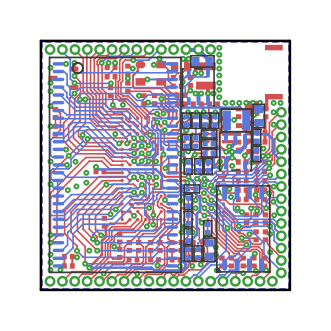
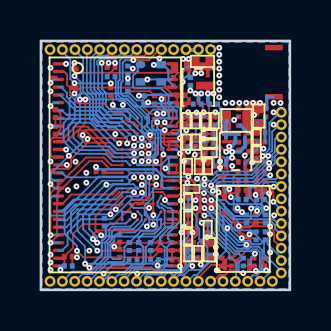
top track: (74, 49) (83, 58) (83, 91) (89, 97) (89, 118) (96, 126) (122, 126) -> none
bottom track: none -> (74, 49) (83, 58) (83, 91) (89, 97) (89, 118) (96, 126) (122, 126)
top track: (86, 49) (86, 90) (93, 96) (93, 116) (99, 122) (123, 122) (130, 126) -> none
bottom track: none -> (86, 49) (86, 90) (93, 96) (93, 116) (99, 122) (123, 122) (130, 126)
top track: (99, 49) (90, 58) (90, 90) (96, 95) (96, 113) (101, 118) (122, 118) -> none
bottom track: none -> (99, 49) (90, 58) (90, 90) (96, 95) (96, 113) (101, 118) (122, 118)
top track: (110, 49) (112, 50) (106, 55) (97, 55) (94, 59) (94, 89) (99, 94) (99, 110) (103, 114) (123, 114) -> (58, 71) (64, 71) (67, 74) (70, 95) (78, 103) (104, 103) (113, 113) (123, 114)
top track: (124, 49) (116, 58) (99, 58) (97, 61) (98, 89) (102, 93) (102, 107) (106, 111) (128, 111) (130, 118) -> none
bottom track: none -> (124, 49) (116, 58) (99, 58) (97, 61) (98, 89) (102, 93) (102, 107) (106, 111) (128, 111) (130, 118)
bottom track: (161, 49) (148, 60) (133, 60) -> (145, 126) (149, 122) (149, 116) (128, 95) (120, 94) (122, 62) (125, 60) (133, 60)
bottom track: (198, 49) (209, 60) (207, 75) (194, 76) (185, 86) (185, 95) (188, 101) -> none
part footprint: [190, 54, 215, 68] -> [190, 54, 215, 68]
part footprint: [48, 56, 182, 274] -> [48, 56, 182, 274]
top track: (124, 56) (119, 60) (118, 95) (121, 98) (126, 98) (145, 118) -> none
bottom track: (124, 56) (108, 56) (101, 62) -> (137, 118) (129, 108) (109, 108) (105, 105) (105, 92) (102, 89) (101, 62)
bottom track: none -> (124, 56) (119, 60) (118, 95) (121, 98) (126, 98) (145, 118)
bottom track: (159, 58) (164, 63) (172, 63) -> none
top track: (133, 60) (125, 60) (122, 62) (120, 94) (128, 95) (149, 116) (149, 122) (145, 126) -> (133, 60) (148, 60) (161, 49)
part footprint: [135, 60, 167, 86] -> [135, 60, 167, 86]
top track: (101, 62) (102, 89) (105, 92) (105, 105) (109, 108) (129, 108) (137, 118) -> (101, 62) (108, 56) (124, 56)
part footprint: [125, 63, 131, 77] -> [125, 63, 131, 77]
top track: (140, 64) (137, 64) (137, 71) (133, 75) (133, 86) (134, 88) (160, 88) (168, 95) (168, 103) (176, 111) (176, 118) -> none
bottom track: none -> (140, 64) (137, 64) (137, 71) (133, 75) (133, 86) (134, 88) (160, 88) (168, 95) (168, 103) (176, 111) (176, 118)
bottom track: none -> (153, 64) (163, 64) (168, 69) (168, 80) (173, 86)
bottom track: none -> (187, 66) (187, 67)
part footprint: [181, 68, 215, 107] -> [181, 68, 215, 107]
bottom track: (58, 71) (64, 71) (67, 74) (70, 95) (78, 103) (104, 103) (113, 113) (123, 114) -> (110, 49) (112, 50) (106, 55) (97, 55) (94, 59) (94, 89) (99, 94) (99, 110) (103, 114) (123, 114)
top track: none -> (172, 71) (77, 72) (74, 75)
bottom track: (172, 71) (77, 72) (74, 75) -> none
part footprint: [104, 74, 118, 80] -> [104, 74, 118, 80]
part footprint: [187, 74, 194, 88] -> [187, 74, 194, 88]
top track: (74, 75) (80, 81) (80, 93) (74, 98) (74, 118) (68, 125) (68, 139) (79, 150) (107, 150) (114, 157) -> (58, 141) (66, 141) (77, 130) (85, 130) (111, 157) (114, 157)
top track: (115, 76) (115, 96) (119, 100) (125, 100) (141, 117) (141, 130) (145, 134) (149, 130) (164, 130) -> (172, 196) (178, 196) (182, 191) (182, 185) (179, 182) (179, 158) (183, 155) (183, 151) (177, 145) (164, 143) (164, 130)
part footprint: [125, 80, 131, 94] -> [125, 80, 131, 94]
bottom track: (172, 87) (80, 87) (74, 93) -> (130, 164) (126, 161) (113, 161) (105, 153) (76, 153) (63, 141) (63, 122) (69, 116) (69, 98) (74, 93)
top track: (74, 93) (69, 98) (69, 116) (63, 122) (63, 141) (76, 153) (105, 153) (113, 161) (126, 161) (130, 164) -> (74, 93) (80, 87) (172, 87)
part footprint: [141, 93, 147, 107] -> [141, 93, 147, 107]
bottom track: none -> (273, 96) (266, 96) (265, 108)
bottom track: (161, 98) (178, 98) (182, 107) (240, 107) (246, 113) (246, 122) (256, 122) (256, 134) (267, 134) (273, 139) (273, 153) (281, 161) -> (161, 98) (161, 105) (168, 112) (168, 118)
top track: (79, 99) (79, 120) (73, 127) (73, 137) (82, 146) (109, 146) (116, 153) -> (58, 157) (52, 157) (50, 155) (50, 139) (52, 137) (64, 137) (75, 126) (87, 126) (116, 153)
part footprint: [190, 101, 204, 107] -> [190, 101, 204, 107]
part footprint: [207, 101, 221, 107] -> [207, 101, 221, 107]
part footprint: [252, 103, 266, 129] -> [252, 103, 266, 129]
part footprint: [220, 108, 253, 133] -> [220, 108, 253, 133]
part footprint: [181, 112, 192, 130] -> [181, 112, 192, 130]
part footprint: [191, 112, 201, 130] -> [191, 112, 201, 130]
part footprint: [200, 112, 211, 130] -> [200, 112, 211, 130]
part footprint: [210, 112, 220, 130] -> [210, 112, 220, 130]
top track: (281, 112) (269, 122) (269, 149) (262, 156) -> none
bottom track: none -> (281, 112) (269, 122) (269, 149) (262, 156)
bottom track: none -> (238, 116) (234, 119)
top track: (265, 116) (264, 141) -> none
bottom track: none -> (265, 116) (264, 141)
top track: (281, 124) (281, 122) (272, 131) (272, 150) (268, 156) -> none
bottom track: none -> (281, 124) (281, 122) (272, 131) (272, 150) (268, 156)
bottom track: none -> (238, 125) (240, 125) (248, 133)
part footprint: [252, 128, 262, 146] -> [252, 128, 262, 146]
part footprint: [200, 129, 218, 139] -> [200, 129, 218, 139]
bottom track: (164, 130) (164, 143) (177, 145) (183, 151) (183, 155) (179, 158) (179, 182) (182, 185) (182, 191) (178, 196) (172, 196) -> (164, 130) (149, 130) (145, 134) (141, 130) (141, 117) (125, 100) (119, 100) (115, 96) (115, 76)
part footprint: [219, 132, 253, 171] -> [219, 132, 253, 171]
part footprint: [181, 133, 192, 151] -> [181, 133, 192, 151]
part footprint: [191, 133, 201, 151] -> [191, 133, 201, 151]
bottom track: none -> (238, 133) (223, 134)
top track: (281, 137) (274, 138) (274, 152) (272, 154) (272, 159) (269, 162) (264, 161) -> none
bottom track: none -> (281, 137) (274, 138) (274, 152) (272, 154) (272, 159) (269, 162) (264, 161)
bottom track: (87, 138) (86, 144) (71, 159) (71, 166) (68, 168) (52, 168) (50, 174) -> (68, 155) (50, 174)
part footprint: [200, 138, 218, 149] -> [200, 138, 218, 149]
bottom track: (58, 141) (66, 141) (77, 130) (85, 130) (111, 157) (114, 157) -> (74, 75) (80, 81) (80, 93) (74, 98) (74, 118) (68, 125) (68, 139) (79, 150) (107, 150) (114, 157)
bottom track: none -> (207, 141) (192, 141) (184, 149)
part footprint: [252, 145, 262, 163] -> [252, 145, 262, 163]
part footprint: [200, 148, 218, 158] -> [200, 148, 218, 158]
bottom track: none -> (281, 149) (274, 156) (274, 163) (264, 171)
bottom track: (116, 153) (87, 126) (75, 126) (64, 137) (52, 137) (50, 139) (50, 155) (52, 157) (58, 157) -> (116, 153) (109, 146) (82, 146) (73, 137) (73, 127) (79, 120) (79, 99)
top track: (68, 155) (50, 174) -> (87, 138) (86, 144) (71, 159) (71, 166) (68, 168) (52, 168) (50, 174)
bottom track: none -> (176, 157) (168, 157) (168, 172)
part footprint: [183, 158, 193, 175] -> [183, 158, 193, 175]
part footprint: [194, 158, 204, 175] -> [194, 158, 204, 175]
part footprint: [203, 158, 213, 175] -> [203, 158, 213, 175]
bottom track: (220, 167) (213, 167) (210, 170) (188, 170) (188, 176) (194, 182) (194, 192) (199, 198) (199, 210) (197, 213) (197, 234) (182, 245) (182, 261) (185, 264) (182, 270) (154, 270) (151, 267) (89, 267) -> (130, 219) (125, 223) (110, 223) (105, 227) (105, 237) (101, 240) (101, 254) (89, 267)
bottom track: none -> (160, 172) (164, 176) (188, 176)
top track: (122, 180) (102, 180) (71, 212) (71, 232) (85, 246) (85, 263) -> none
bottom track: none -> (122, 180) (102, 180) (71, 212) (71, 232) (85, 246) (85, 263)
top track: (130, 180) (125, 176) (98, 176) (64, 211) (64, 233) (76, 245) (76, 250) -> (172, 250) (159, 250) (153, 257) (83, 257) (76, 250)
bottom track: (174, 180) (179, 186) (179, 190) (178, 192) (159, 192) (149, 207) -> (129, 203) (133, 207) (149, 207)
top track: none -> (57, 182) (58, 203) (62, 203) (71, 194) (112, 194) (118, 188)
bottom track: (57, 182) (58, 203) (62, 203) (71, 194) (112, 194) (118, 188) -> none
top track: (106, 184) (77, 213) (77, 230) (97, 250) -> (172, 242) (161, 242) (154, 250) (97, 250)
part footprint: [183, 184, 201, 194] -> [183, 184, 201, 194]
part footprint: [216, 185, 271, 273] -> [216, 185, 271, 273]
top track: (118, 188) (116, 188) (89, 215) (89, 229) (97, 237) (97, 242) -> (172, 235) (163, 235) (156, 242) (97, 242)
top track: (137, 188) (133, 184) (113, 184) (83, 214) (83, 229) (93, 239) -> (172, 211) (179, 214) (178, 223) (163, 223) (156, 230) (97, 230) (93, 234) (93, 239)
part footprint: [183, 193, 193, 211] -> [183, 193, 193, 211]
top track: none -> (149, 195) (142, 202) (135, 202) (114, 224) (82, 224) (73, 234) (73, 247) (63, 258) (58, 258)
bottom track: (149, 195) (142, 202) (135, 202) (114, 224) (82, 224) (73, 234) (73, 247) (63, 258) (58, 258) -> none
top track: (161, 196) (157, 205) (164, 210) (164, 228) (145, 247) (145, 262) (141, 266) (133, 266) (125, 274) (118, 274) (111, 279) (111, 281) -> none
bottom track: none -> (161, 196) (157, 205) (164, 210) (164, 228) (145, 247) (145, 262) (141, 266) (133, 266) (125, 274) (118, 274) (111, 279) (111, 281)
bottom track: none -> (192, 196) (188, 199) (188, 205) (180, 210) (180, 221) (167, 233) (167, 238) (172, 243)
part footprint: [235, 196, 249, 203] -> [235, 196, 249, 203]
part footprint: [254, 196, 268, 203] -> [254, 196, 268, 203]
bottom track: (281, 198) (270, 197) (266, 201) (266, 208) -> (215, 196) (219, 199) (225, 199) (229, 204) (260, 204) (266, 208)
top track: (264, 199) (270, 204) (270, 220) (272, 222) -> (204, 200) (208, 204) (213, 204) (231, 222) (272, 222)
bottom track: (204, 200) (208, 204) (213, 204) (231, 222) (272, 222) -> (264, 199) (270, 204) (270, 220) (272, 222)
top track: (161, 203) (172, 210) (172, 224) (159, 237) (159, 242) (164, 247) (164, 263) (158, 269) (134, 269) (124, 281) -> none
bottom track: none -> (161, 203) (172, 210) (172, 224) (159, 237) (159, 242) (164, 247) (164, 263) (158, 269) (134, 269) (124, 281)
top track: (215, 203) (219, 208) (219, 213) (231, 222) (231, 230) (241, 238) -> (210, 281) (213, 281) (219, 274) (224, 274) (229, 270) (237, 270) (237, 260) (250, 246) (250, 240) (247, 238) (241, 238)
top track: (223, 203) (225, 208) (237, 220) (238, 226) -> (281, 248) (274, 240) (274, 232) (269, 226) (238, 226)
part footprint: [183, 210, 193, 228] -> [183, 210, 193, 228]
top track: (137, 211) (141, 215) (141, 220) (133, 229) (114, 229) (111, 231) (111, 239) (107, 243) (107, 258) (92, 274) (82, 274) (74, 281) -> none
bottom track: none -> (137, 211) (141, 215) (141, 220) (133, 229) (114, 229) (111, 231) (111, 239) (107, 243) (107, 258) (92, 274) (82, 274) (74, 281)
top track: (145, 211) (149, 217) (146, 226) -> none
bottom track: none -> (145, 211) (149, 217) (146, 226)
top track: (161, 211) (157, 217) (157, 227) (153, 230) (141, 230) (124, 247) (123, 262) (108, 262) (87, 281) -> none
bottom track: none -> (161, 211) (157, 217) (157, 227) (153, 230) (141, 230) (124, 247) (123, 262) (108, 262) (87, 281)
bottom track: (172, 211) (179, 214) (178, 223) (163, 223) (156, 230) (97, 230) (93, 234) (93, 239) -> (137, 188) (133, 184) (113, 184) (83, 214) (83, 229) (93, 239)
top track: (192, 211) (196, 215) (199, 239) (207, 247) (207, 263) (200, 269) (189, 269) (183, 275) (178, 275) (173, 281) -> none
bottom track: none -> (192, 211) (196, 215) (199, 239) (207, 247) (207, 263) (200, 269) (189, 269) (183, 275) (178, 275) (173, 281)
top track: (215, 211) (219, 217) (219, 230) (237, 248) (258, 246) (262, 250) (262, 258) (270, 263) (270, 272) (260, 281) -> none
bottom track: none -> (215, 211) (219, 217) (219, 230) (237, 248) (258, 246) (262, 250) (262, 258) (270, 263) (270, 272) (260, 281)
part footprint: [243, 212, 250, 226] -> [243, 212, 250, 226]
part footprint: [262, 212, 269, 226] -> [262, 212, 269, 226]
top track: (265, 214) (263, 214) (263, 211) (259, 206) (252, 206) (251, 218) (246, 222) -> none
bottom track: none -> (265, 214) (263, 214) (263, 211) (259, 206) (252, 206) (251, 218) (246, 222)
part footprint: [101, 215, 108, 229] -> [101, 215, 108, 229]
bottom track: none -> (134, 215) (129, 211) (122, 211) (122, 219)
top track: (130, 219) (125, 223) (110, 223) (105, 227) (105, 237) (101, 240) (101, 254) (89, 267) -> (220, 167) (213, 167) (210, 170) (188, 170) (188, 176) (194, 182) (194, 192) (199, 198) (199, 210) (197, 213) (197, 234) (182, 245) (182, 261) (185, 264) (182, 270) (154, 270) (151, 267) (89, 267)
top track: (137, 219) (130, 226) (112, 226) (109, 229) (109, 238) (105, 242) (105, 257) (91, 271) (72, 271) (62, 281) -> none
bottom track: none -> (137, 219) (130, 226) (112, 226) (109, 229) (109, 238) (105, 242) (105, 257) (91, 271) (72, 271) (62, 281)
top track: (145, 219) (135, 232) (119, 232) (114, 236) (114, 241) (110, 244) (110, 256) (113, 259) (119, 259) (119, 257) -> none
bottom track: none -> (145, 219) (135, 232) (119, 232) (114, 236) (114, 241) (110, 244) (110, 256) (113, 259) (119, 259) (119, 257)
bottom track: (172, 219) (161, 219) -> (99, 281) (102, 281) (111, 271) (124, 271) (132, 264) (140, 264) (143, 261) (143, 246) (138, 242) (138, 238) (143, 233) (154, 233) (160, 227) (161, 219)
bottom track: none -> (207, 219) (207, 231) (229, 253) (229, 258) (236, 262) (235, 281)
top track: (215, 219) (215, 231) (235, 251) (257, 249) (259, 252) (259, 272) (256, 275) (252, 275) (247, 281) -> none
bottom track: none -> (215, 219) (215, 231) (235, 251) (257, 249) (259, 252) (259, 272) (256, 275) (252, 275) (247, 281)
top track: (223, 219) (223, 230) (237, 244) (246, 244) -> (198, 281) (198, 277) (211, 264) (224, 264) (224, 261) (229, 256) (234, 256) (246, 244)
part footprint: [202, 220, 213, 237] -> [202, 220, 213, 237]
bottom track: (238, 226) (269, 226) (274, 232) (274, 240) (281, 248) -> (238, 226) (237, 220) (225, 208) (223, 203)
part footprint: [183, 228, 193, 245] -> [183, 228, 193, 245]
top track: (227, 228) (239, 241) (249, 240) (252, 244) (260, 244) (267, 239) (267, 243) (281, 257) (281, 260) -> none
bottom track: none -> (227, 228) (239, 241) (249, 240) (252, 244) (260, 244) (267, 239) (267, 243) (281, 257) (281, 260)
part footprint: [253, 229, 259, 243] -> [253, 229, 259, 243]
part footprint: [262, 229, 269, 243] -> [262, 229, 269, 243]
bottom track: none -> (188, 232) (188, 236) (181, 242) (185, 247) (185, 265) (181, 270) (165, 270) (161, 274) (147, 274) (145, 281) (148, 281)
bottom track: (172, 235) (163, 235) (156, 242) (97, 242) -> (118, 188) (116, 188) (89, 215) (89, 229) (97, 237) (97, 242)
part footprint: [202, 237, 216, 263] -> [202, 237, 216, 263]
bottom track: (241, 238) (247, 238) (250, 240) (250, 246) (237, 260) (237, 270) (229, 270) (224, 274) (219, 274) (213, 281) (210, 281) -> (241, 238) (231, 230) (231, 222) (219, 213) (219, 208) (215, 203)
part footprint: [126, 240, 133, 253] -> [126, 240, 133, 253]
part footprint: [136, 240, 142, 253] -> [136, 240, 142, 253]
part footprint: [147, 240, 154, 253] -> [147, 240, 154, 253]
top track: (193, 240) (186, 242) (190, 255) (188, 266) (182, 272) (177, 272) (175, 274) (166, 272) (164, 275) (164, 281) (161, 281) -> none
bottom track: none -> (193, 240) (186, 242) (190, 255) (188, 266) (182, 272) (177, 272) (175, 274) (166, 272) (164, 275) (164, 281) (161, 281)
top track: (172, 241) (167, 247) (167, 264) (160, 271) (145, 271) (136, 281) -> none
bottom track: none -> (172, 241) (167, 247) (167, 264) (160, 271) (145, 271) (136, 281)
bottom track: (172, 242) (161, 242) (154, 250) (97, 250) -> (106, 184) (77, 213) (77, 230) (97, 250)
bottom track: (246, 244) (234, 256) (229, 256) (224, 261) (224, 264) (211, 264) (198, 277) (198, 281) -> (246, 244) (237, 244) (223, 230) (223, 219)
part footprint: [183, 245, 193, 263] -> [183, 245, 193, 263]
part footprint: [193, 245, 203, 263] -> [193, 245, 203, 263]
bottom track: (172, 250) (159, 250) (153, 257) (83, 257) (76, 250) -> (130, 180) (125, 176) (98, 176) (64, 211) (64, 233) (76, 245) (76, 250)
part footprint: [240, 255, 246, 269] -> [240, 255, 246, 269]
part footprint: [126, 257, 140, 263] -> [126, 257, 140, 263]
part footprint: [148, 257, 161, 263] -> [148, 257, 161, 263]
bottom track: none -> (129, 259) (124, 264) (112, 264) (103, 273)
part footprint: [61, 263, 75, 269] -> [61, 263, 75, 269]
bottom track: (240, 273) (231, 273) (222, 281) -> (240, 273) (238, 262) (243, 258) (238, 253) (233, 253) (211, 231) (211, 215) (207, 211)

